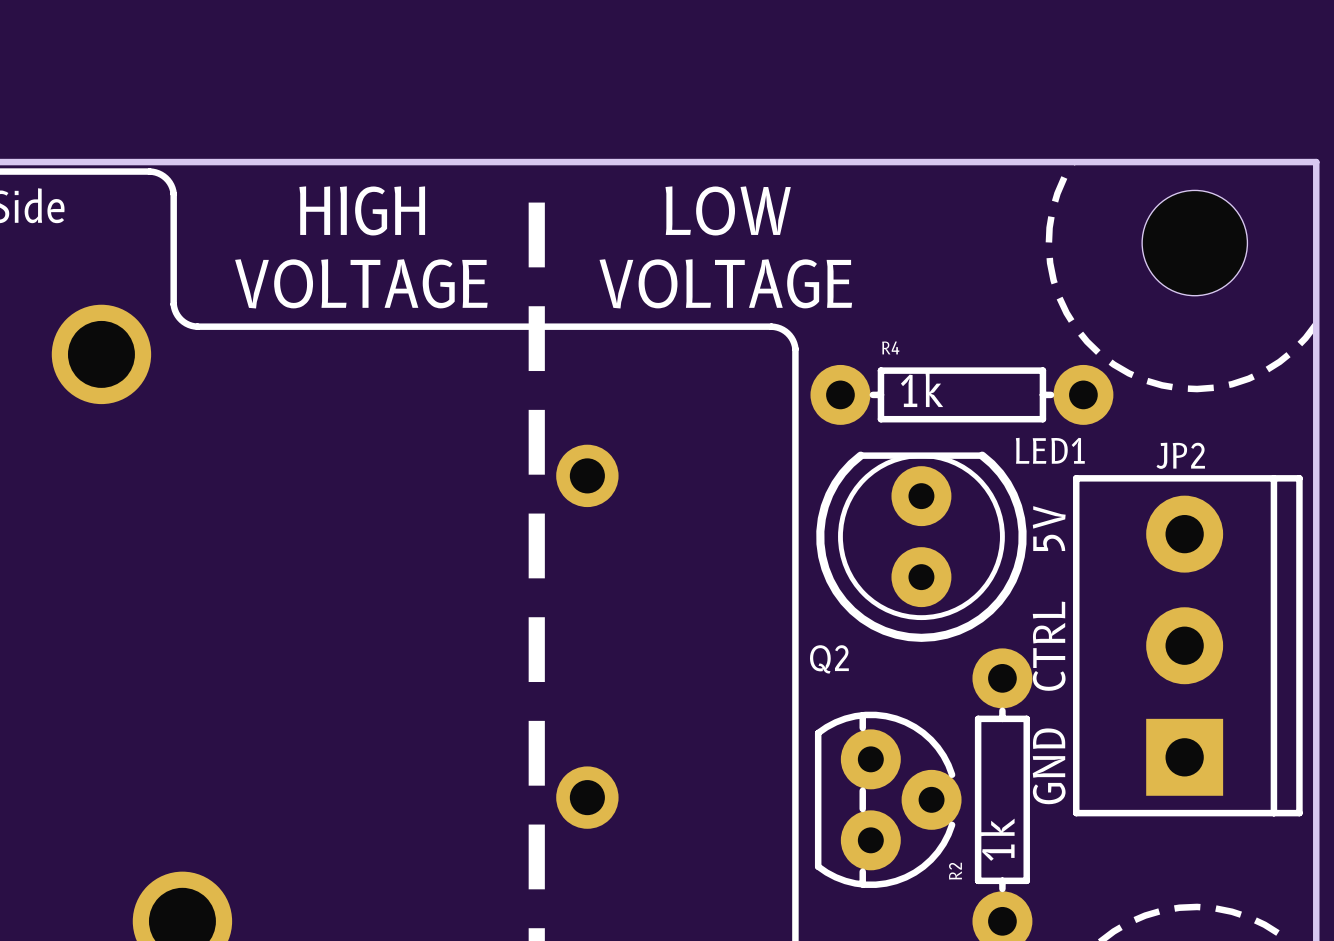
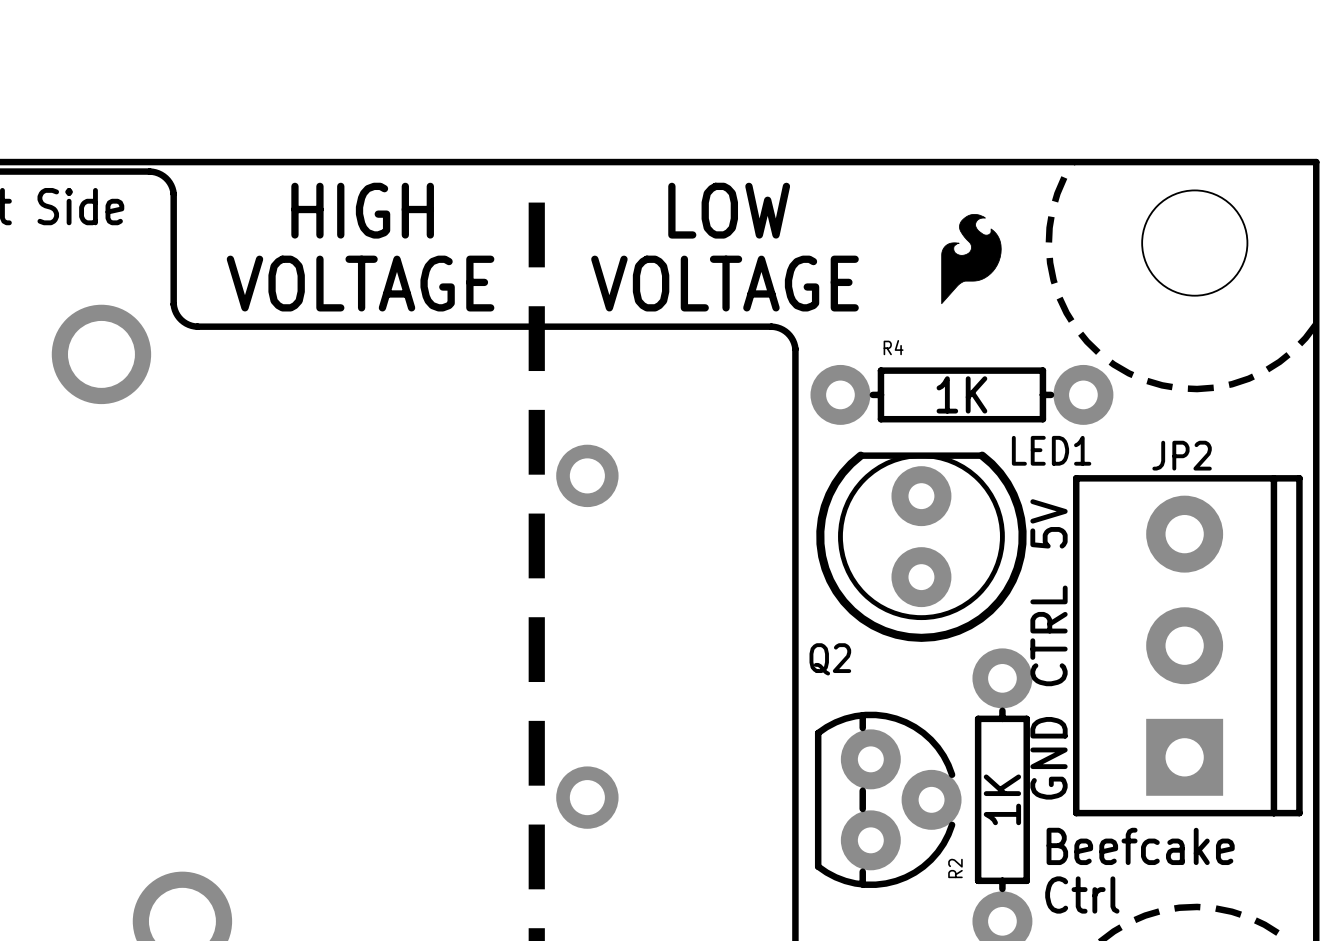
drawing: none -> [941, 213, 1002, 305]
R4 value: 1k (922, 389) -> 1K (961, 394)
R2 value: 1k (997, 839) -> 1K (1002, 799)
text: none -> Beefcake (1140, 846)
text: none -> Ctrl (1082, 895)

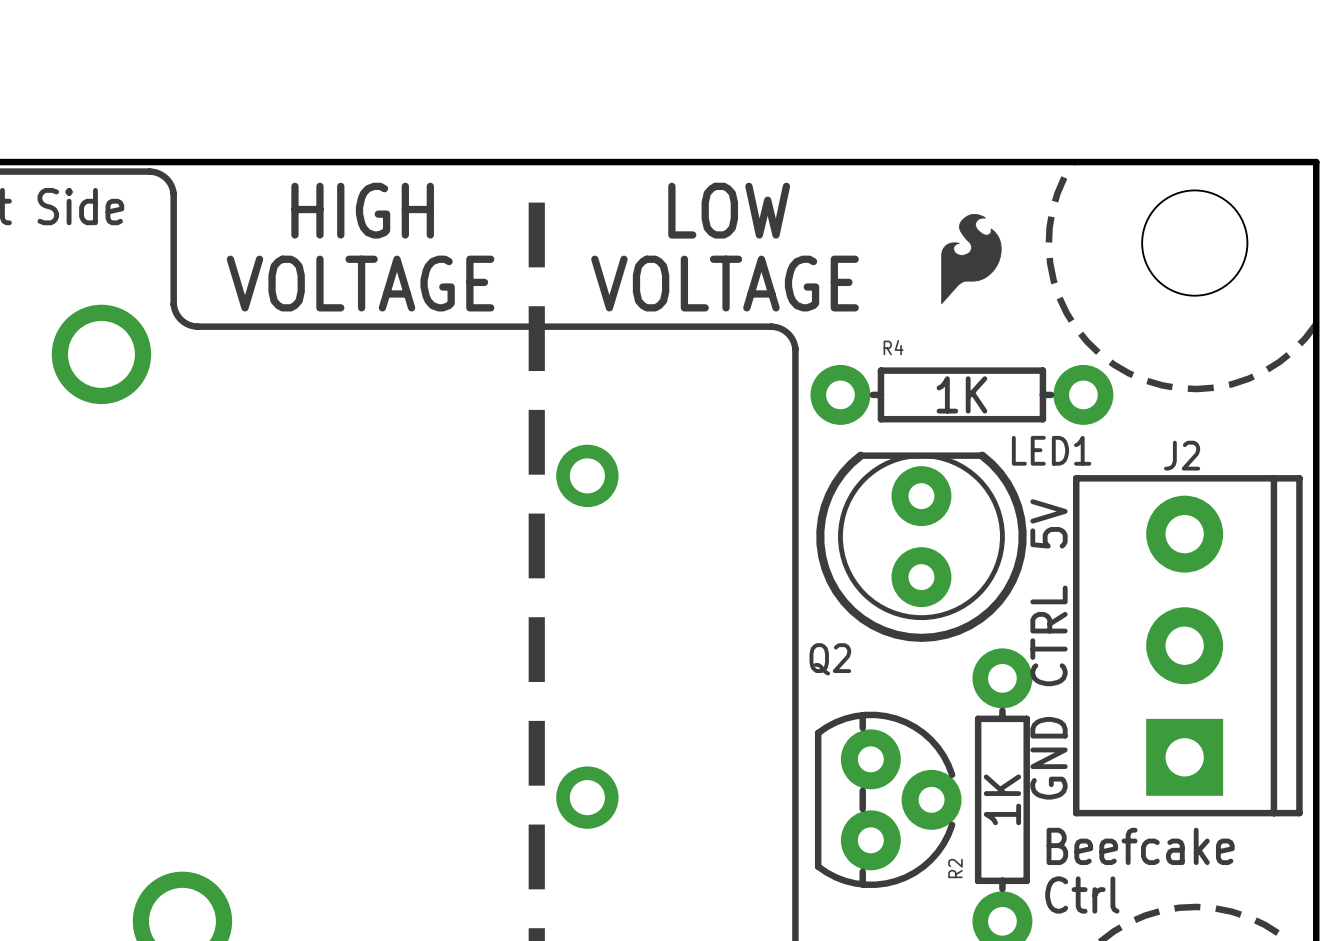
JP2 name: JP2 (1182, 455) -> J2 (1182, 455)

